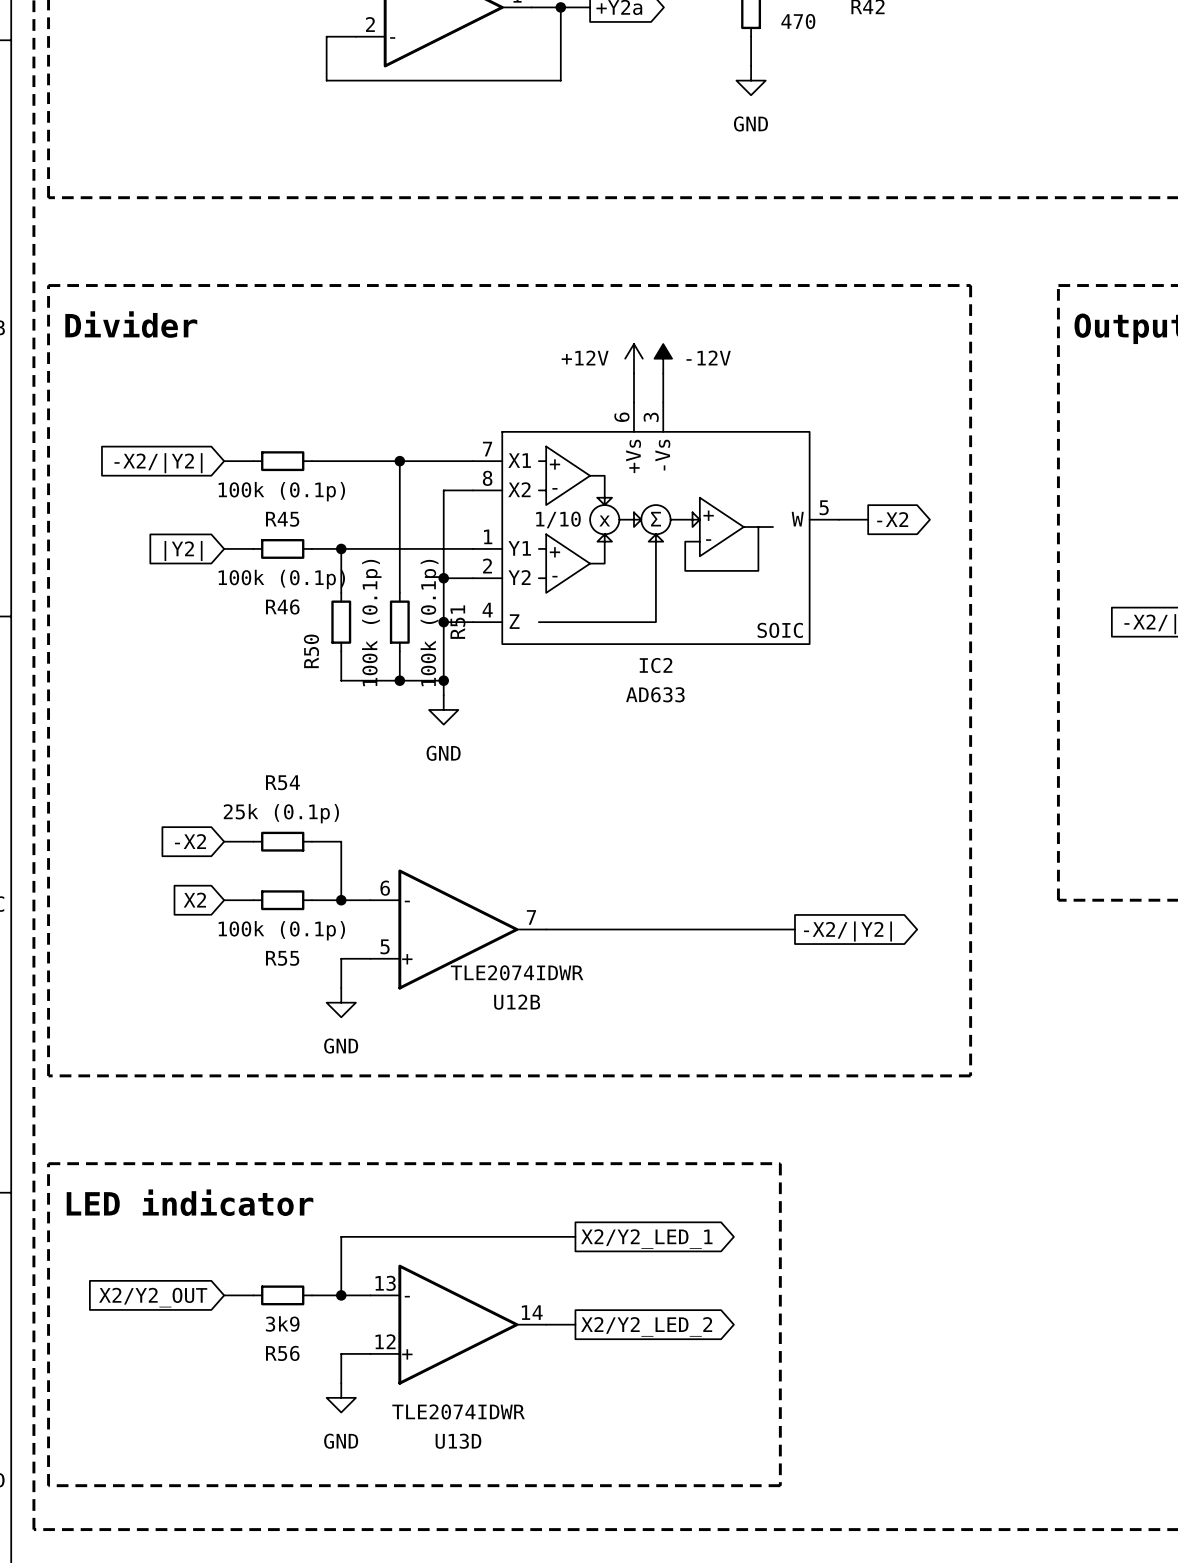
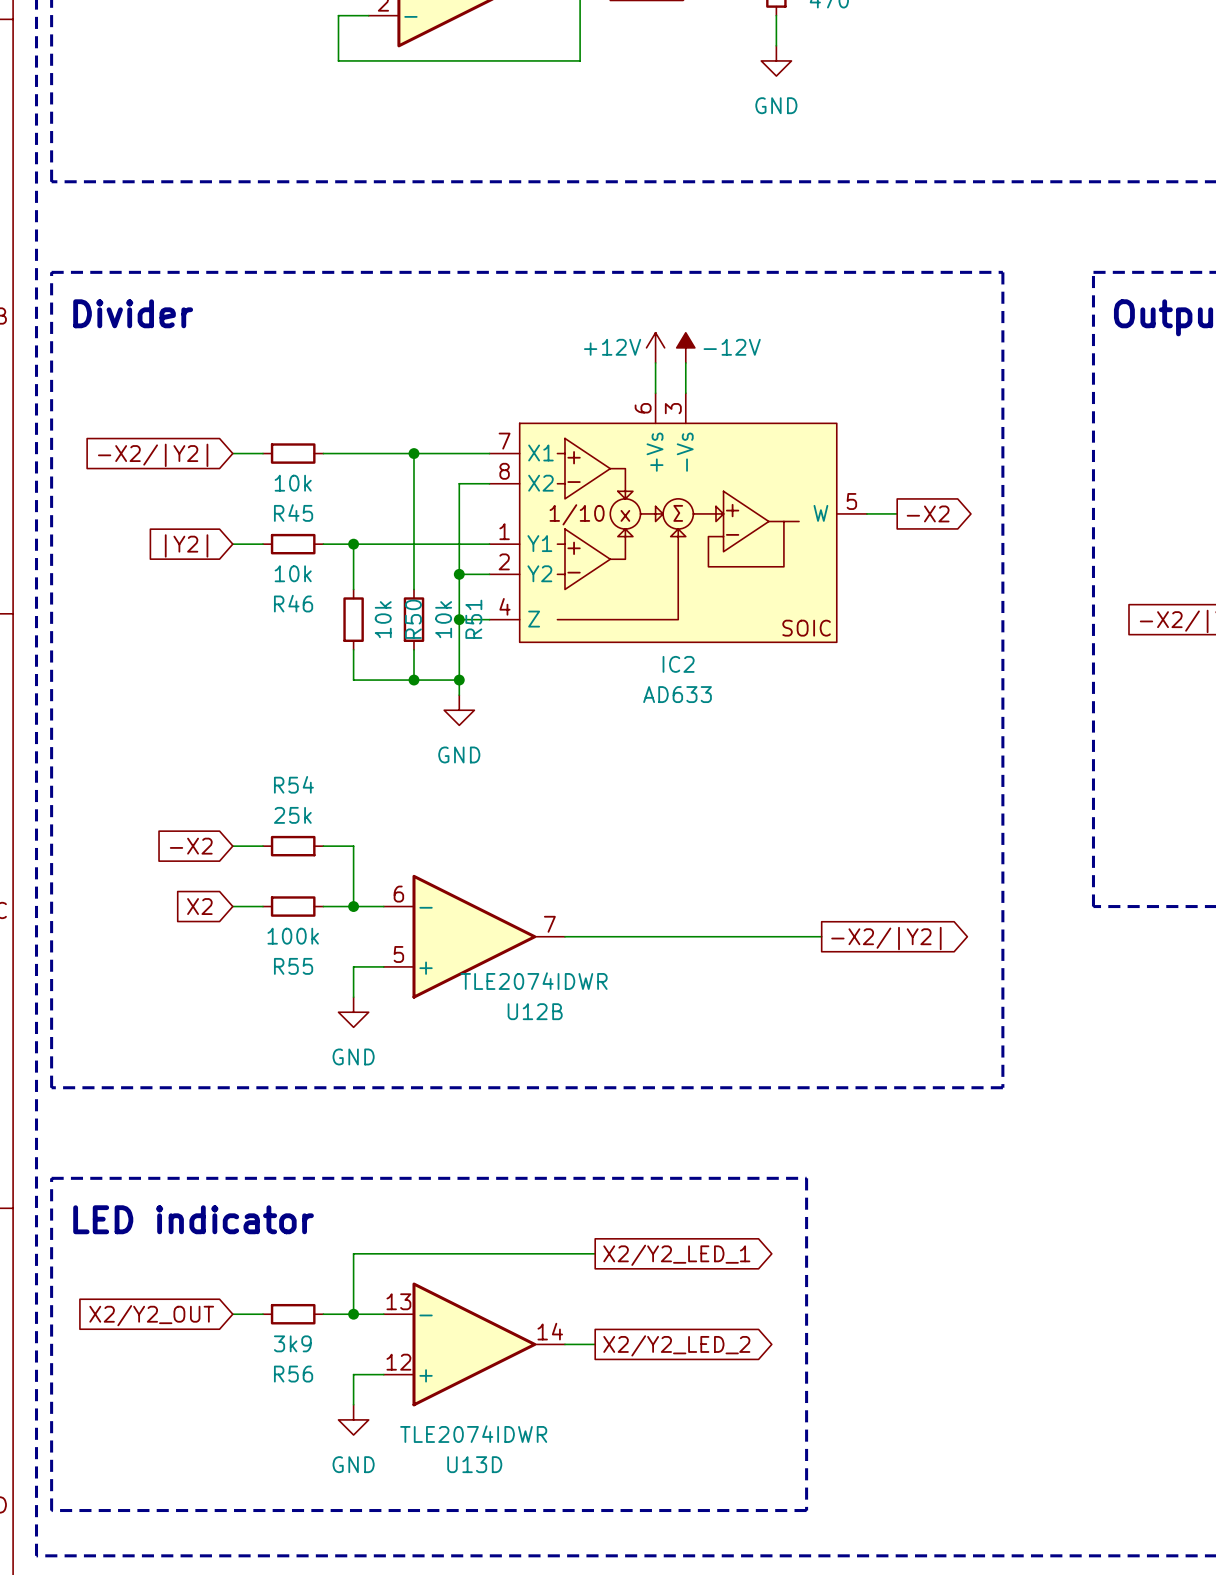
R45 value: 100k (0.1p) (281, 491) -> 10k (293, 483)
R46 value: 100k (0.1p) (281, 579) -> 10k (293, 573)
R50 value: 100k (0.1p) (371, 623) -> 10k (383, 619)
R51 value: 100k (0.1p) (430, 623) -> 10k (443, 619)
R50 name position: R50 (311, 651) -> R50 (413, 619)
R54 value: 25k (0.1p) (281, 813) -> 25k (292, 815)
R55 value: 100k (0.1p) (281, 930) -> 100k (293, 936)

